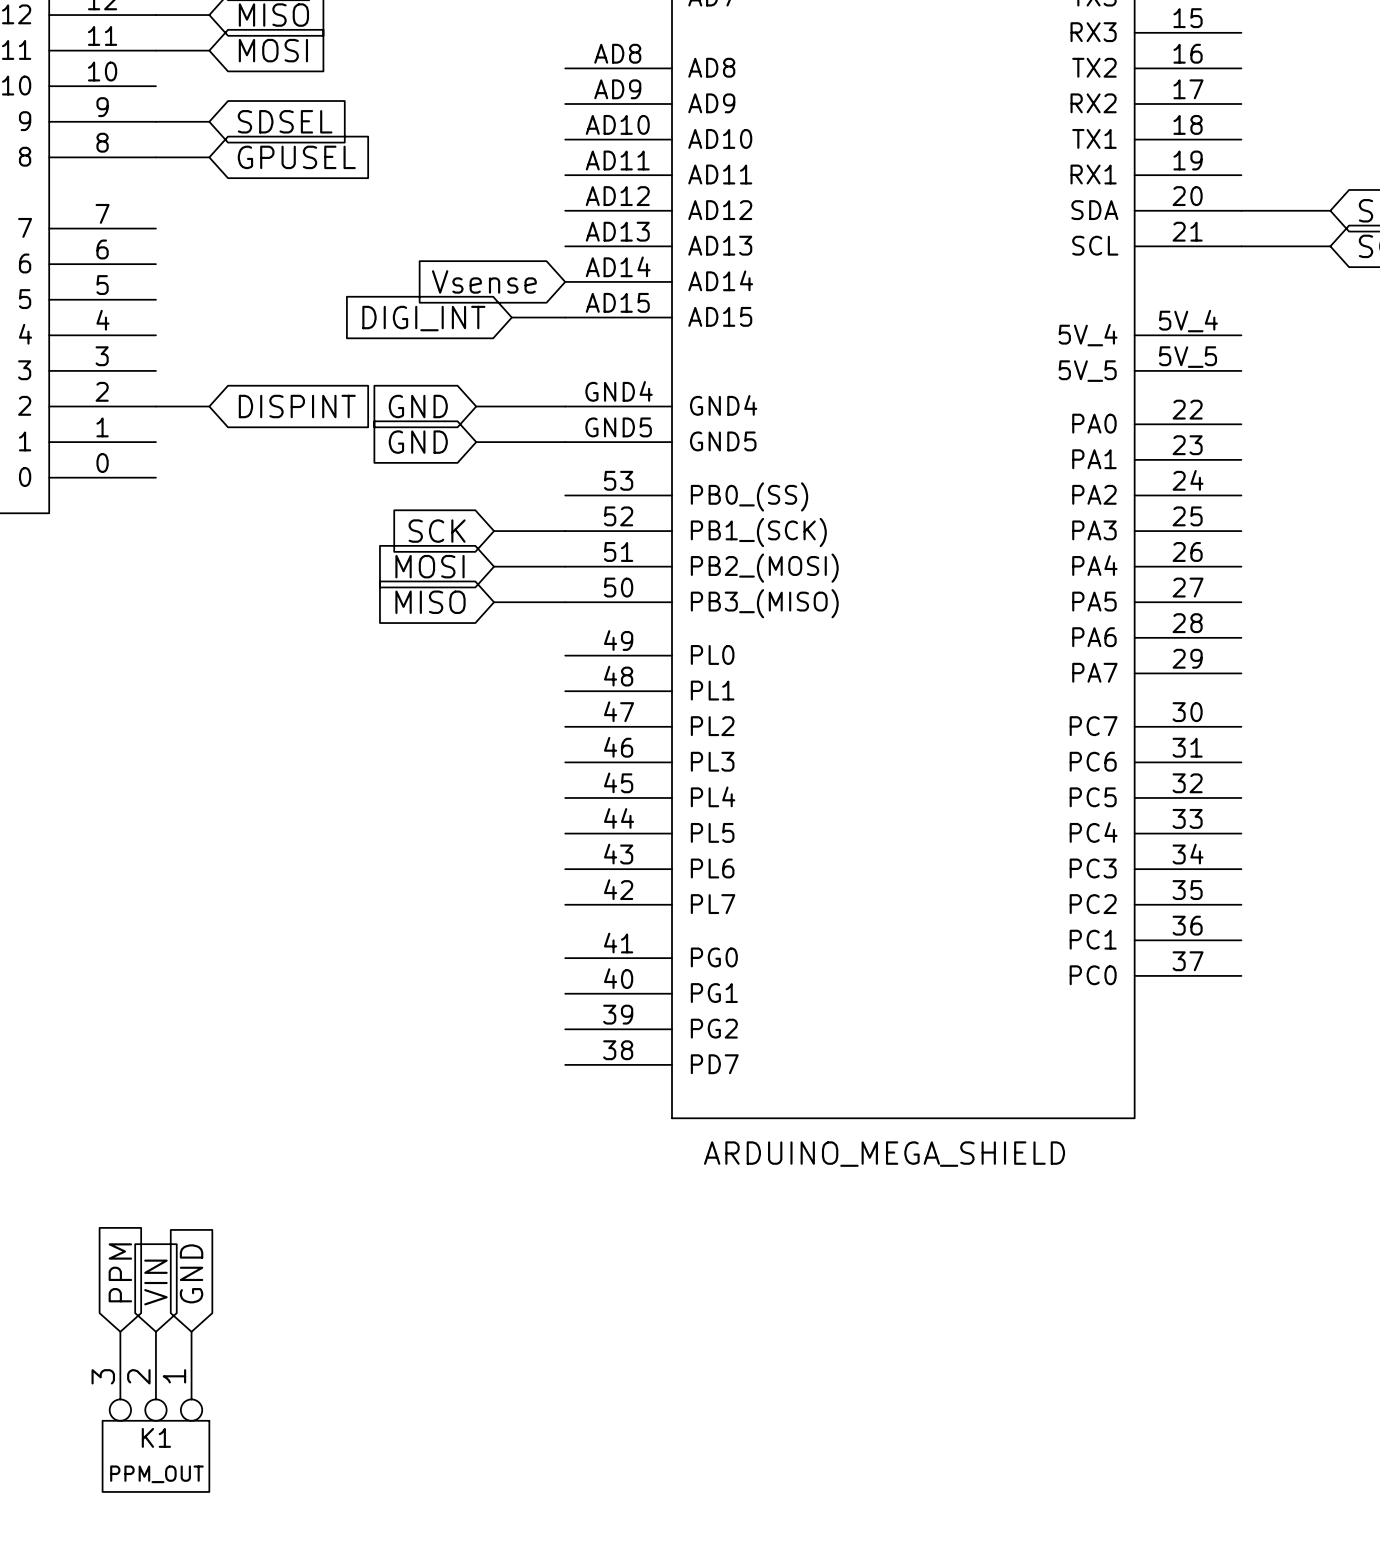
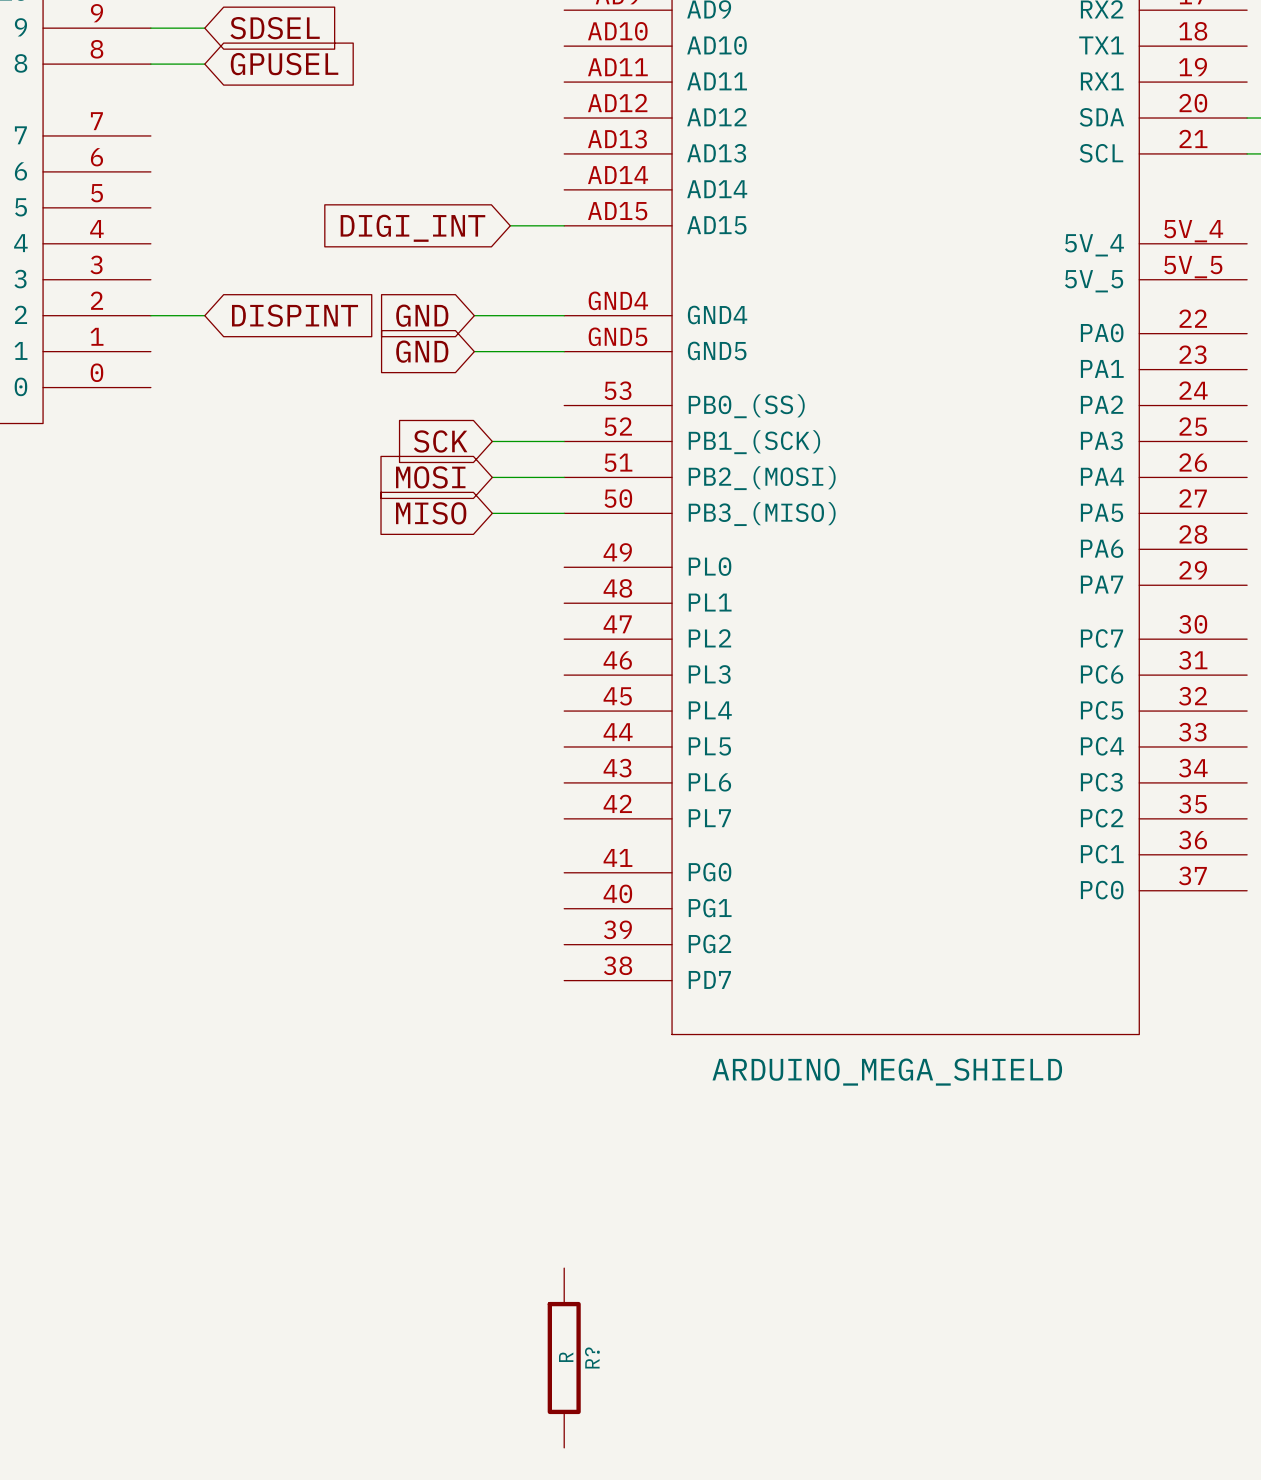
global label: Vsense (484, 281) -> none
global label: PPM (120, 1272) -> none
global label: GND (191, 1273) -> none
global label: VIN (155, 1282) -> none
K1: PPM_OUT (155, 1411) -> none
R?: none -> R (564, 1358)

